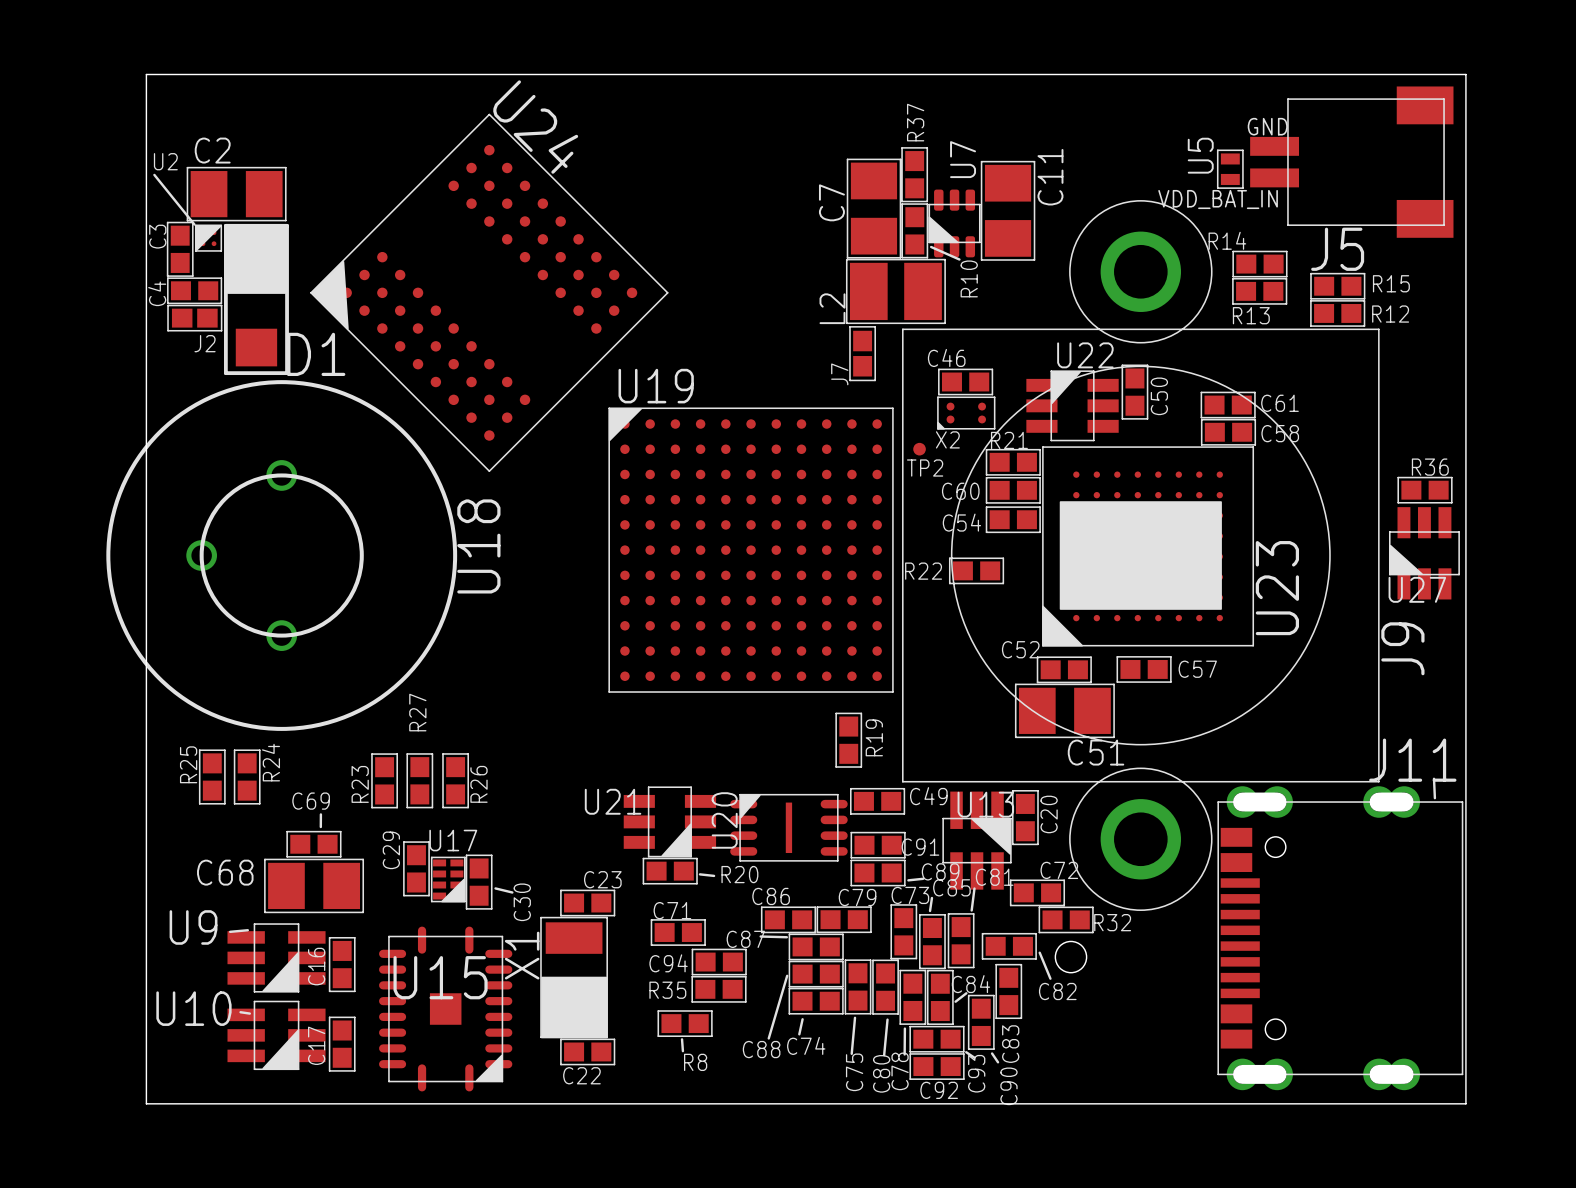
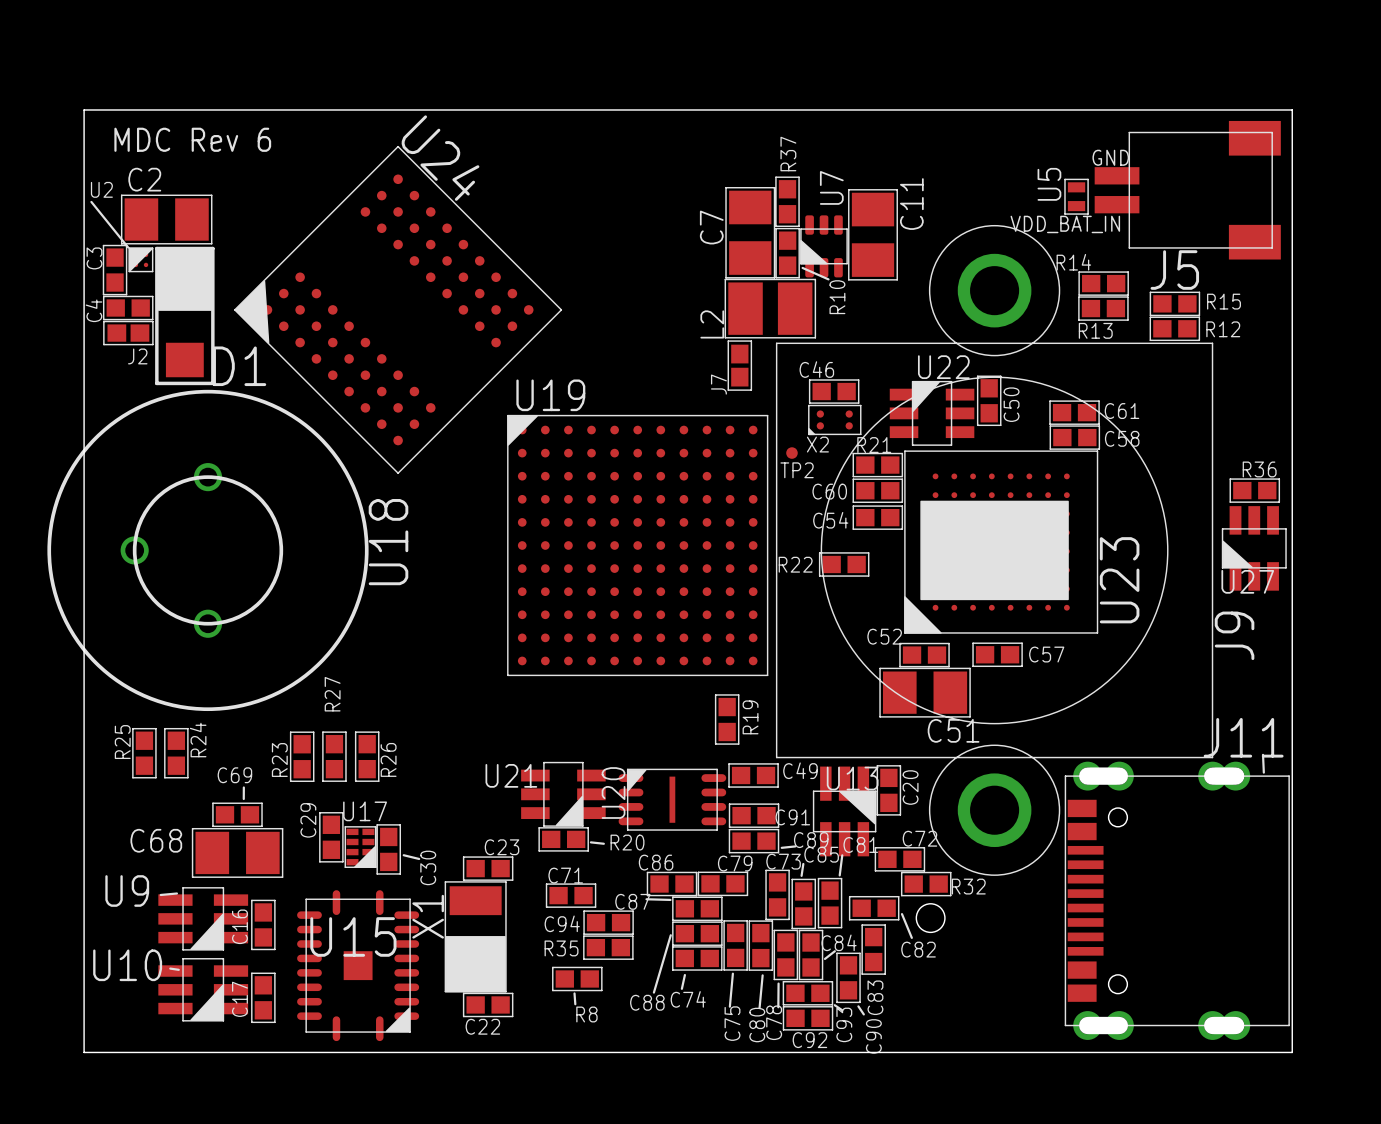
text: none -> MDC Rev 6 (192, 139)

